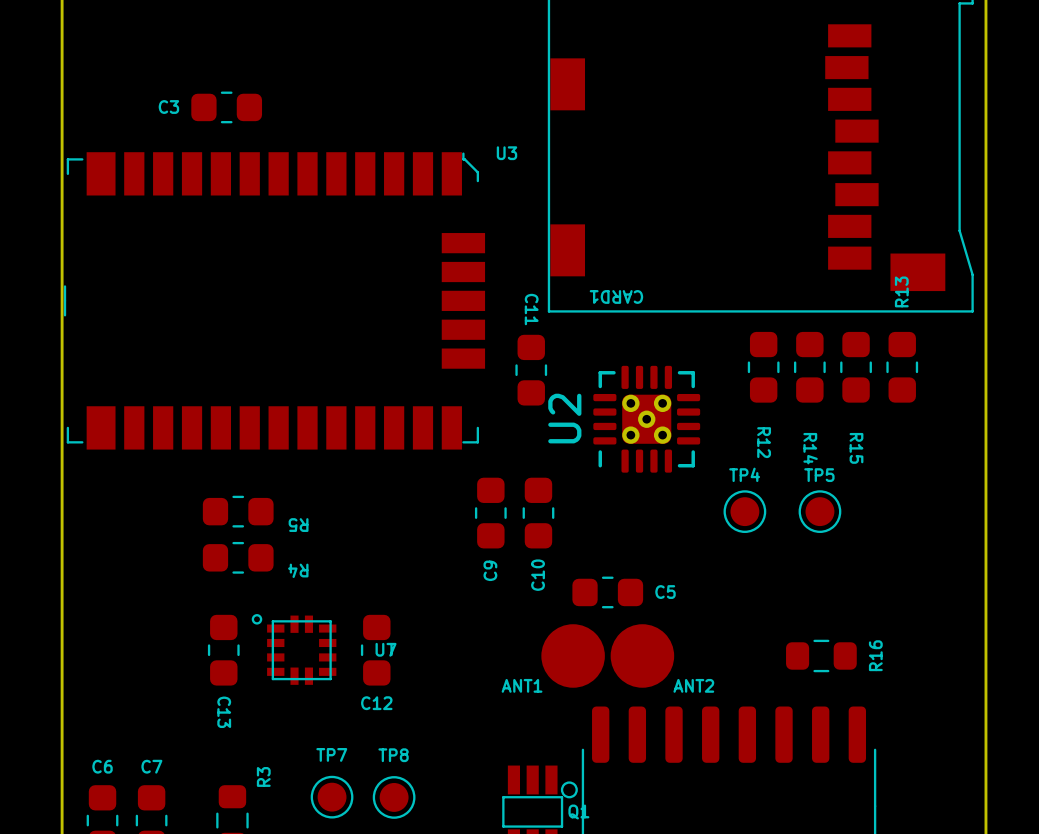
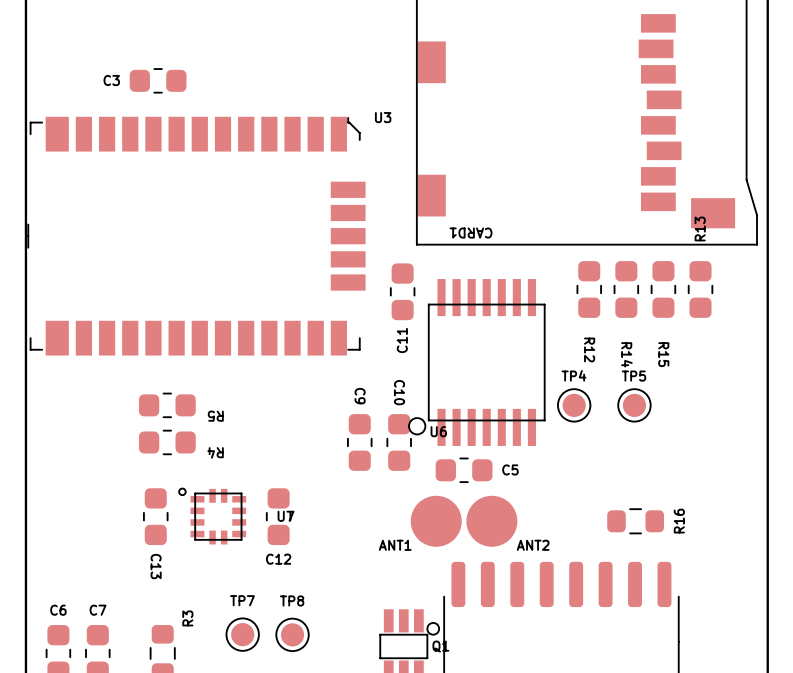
C11 name rotation: 0° (531, 309) -> 180° (402, 340)
C11 name position: C11 (531, 309) -> C11 (402, 340)
U2: (646, 419) -> none
U6: none -> (476, 362)
C9 position: (490, 513) -> (359, 442)
C10 position: (538, 513) -> (399, 442)
C9 name rotation: 0° (490, 570) -> 180° (360, 396)
C9 name position: C9 (490, 570) -> C9 (360, 396)
C10 name rotation: 0° (538, 575) -> 180° (399, 392)
C10 name position: C10 (538, 575) -> C10 (399, 392)

